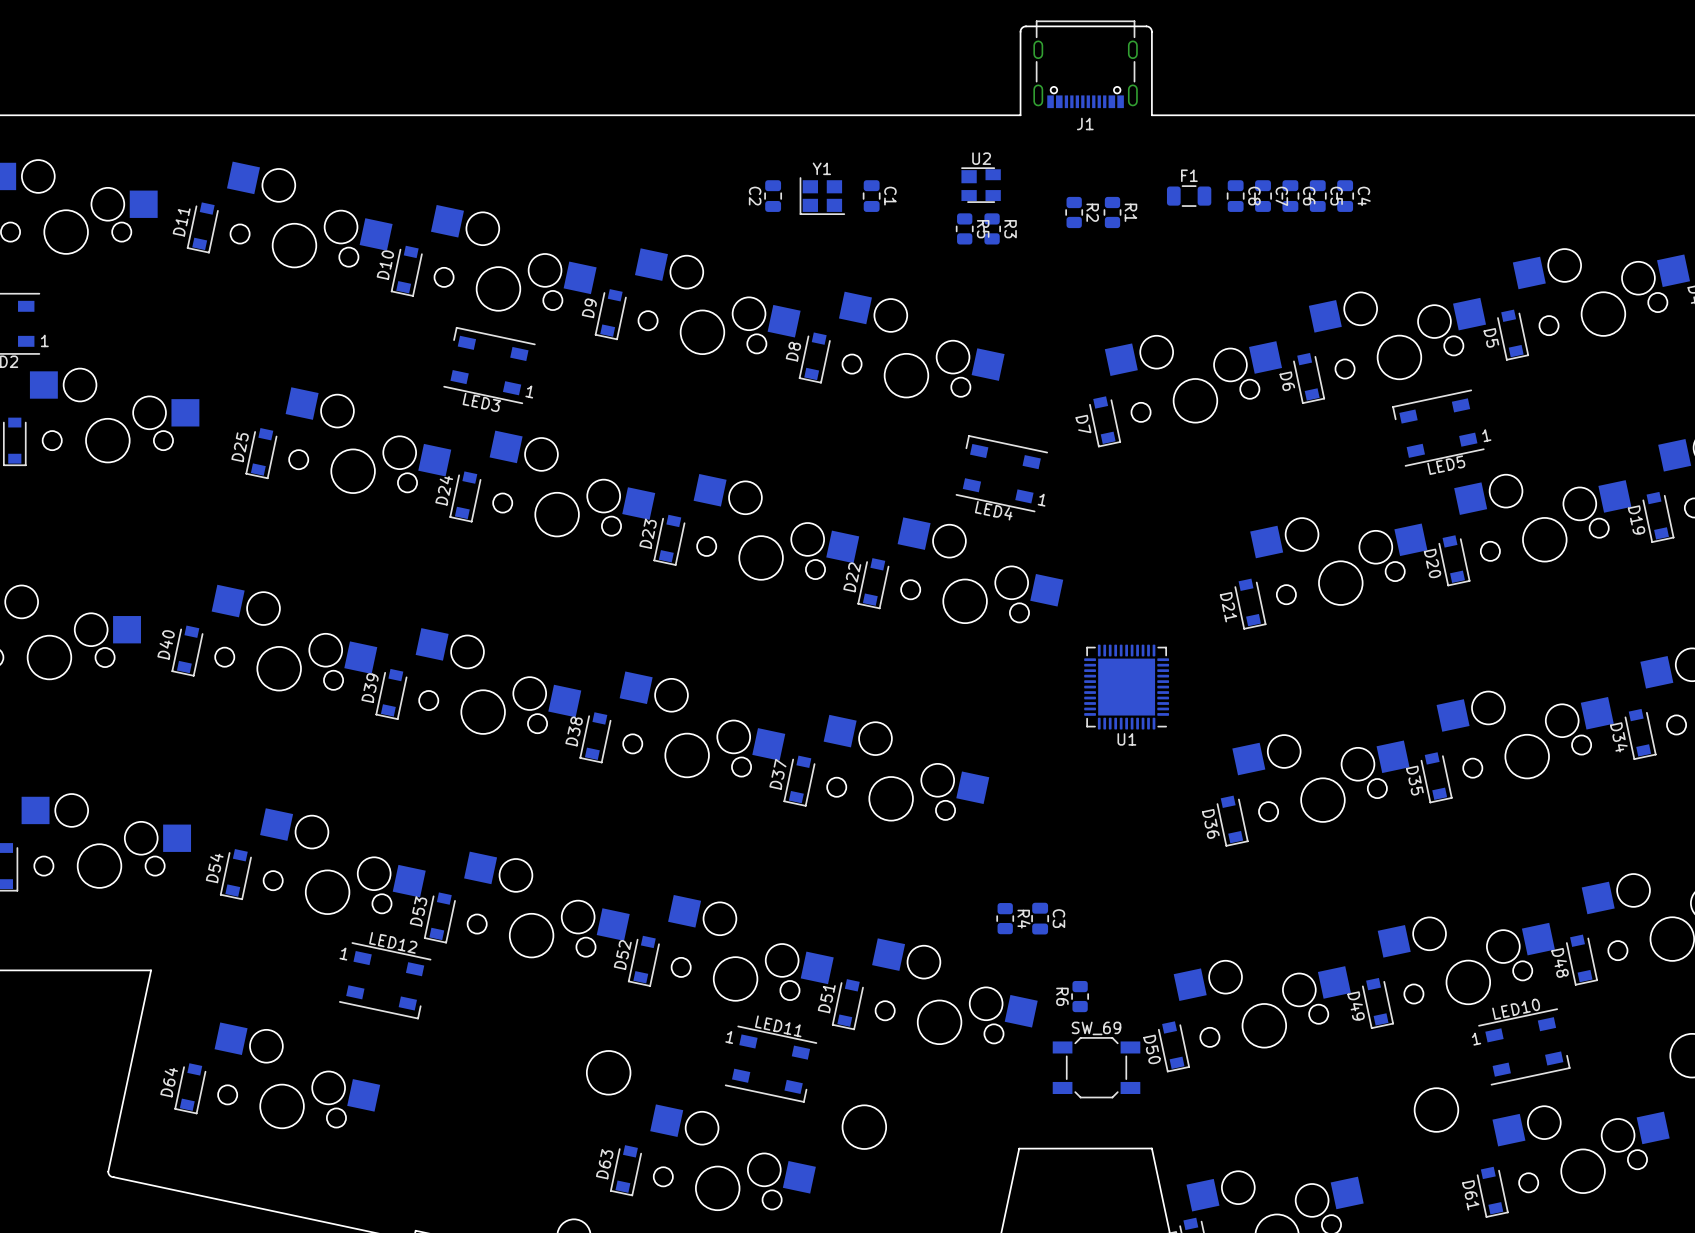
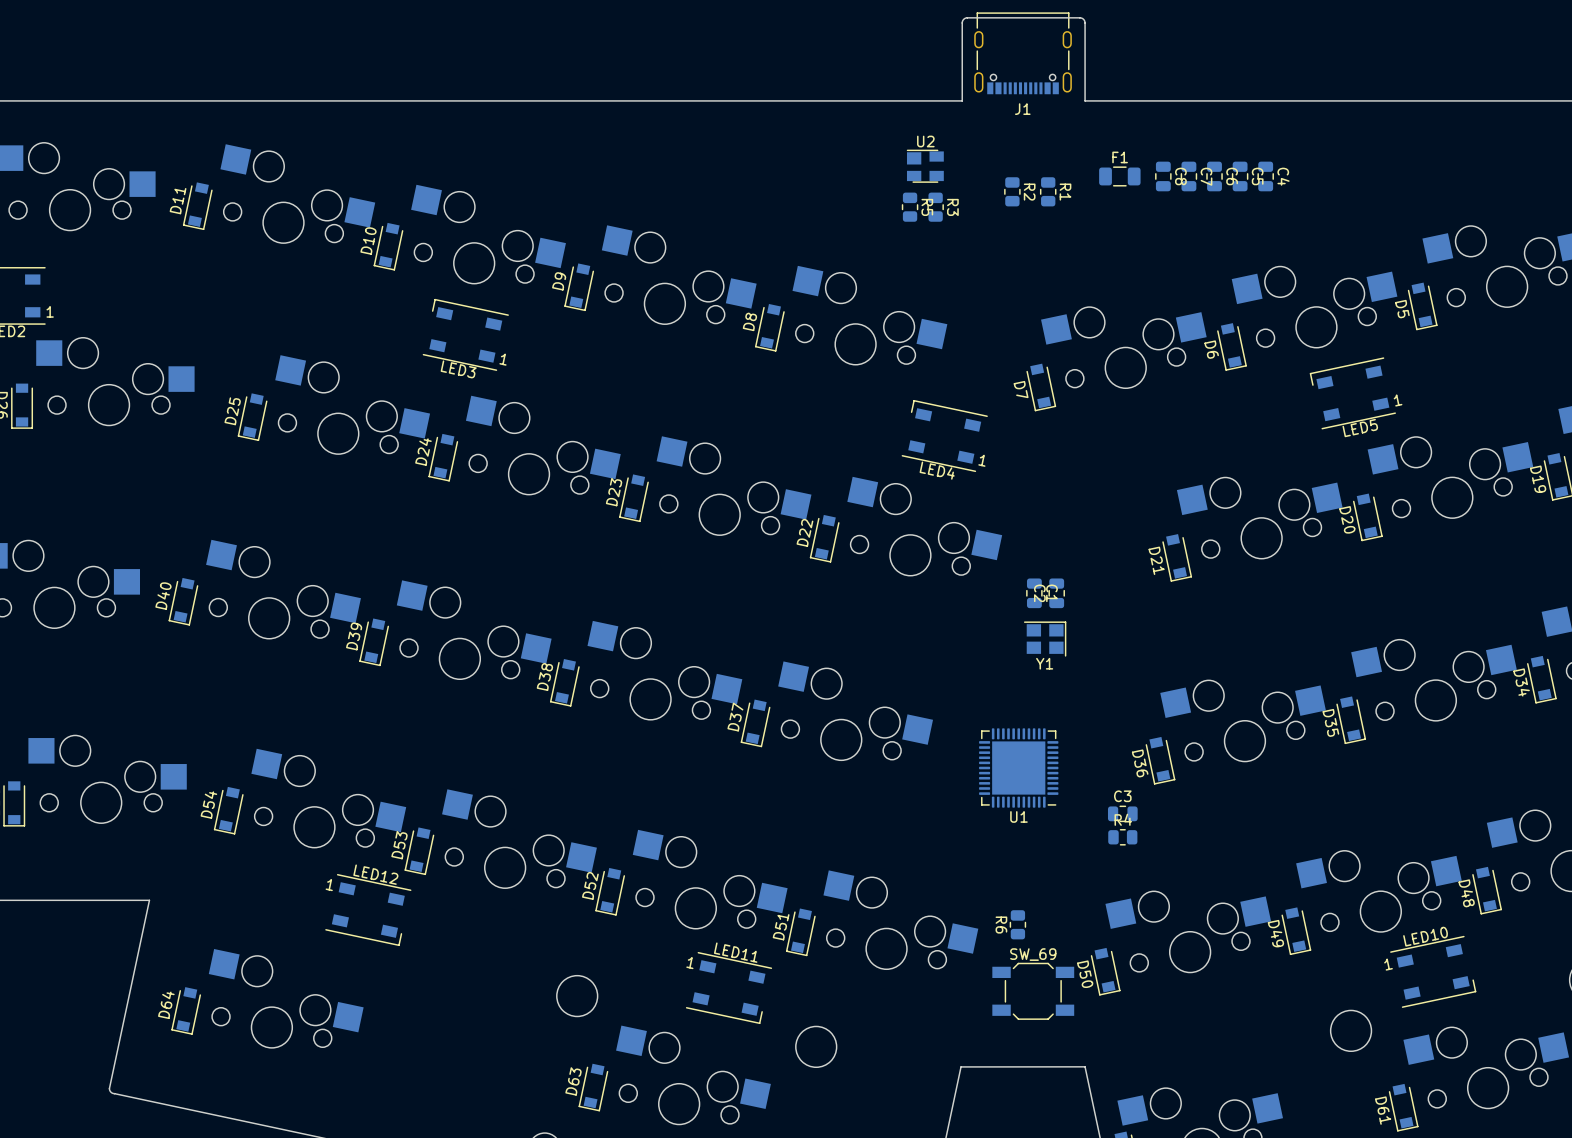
C2 position: (773, 196) -> (1056, 593)
Y1 rotation: 0° (822, 196) -> 180° (1045, 639)
Y1 position: (822, 196) -> (1045, 639)
C1 position: (871, 196) -> (1034, 593)
U1 position: (1126, 687) -> (1018, 768)
R4 rotation: 0° (1005, 918) -> 90° clockwise (1122, 837)
R4 position: (1005, 918) -> (1122, 837)
C3 rotation: 0° (1040, 918) -> 90° clockwise (1122, 813)
C3 position: (1040, 918) -> (1122, 813)
C3 name position: C3 (1058, 918) -> C3 (1122, 796)
R4 name position: R4 (1023, 919) -> R4 (1123, 819)

